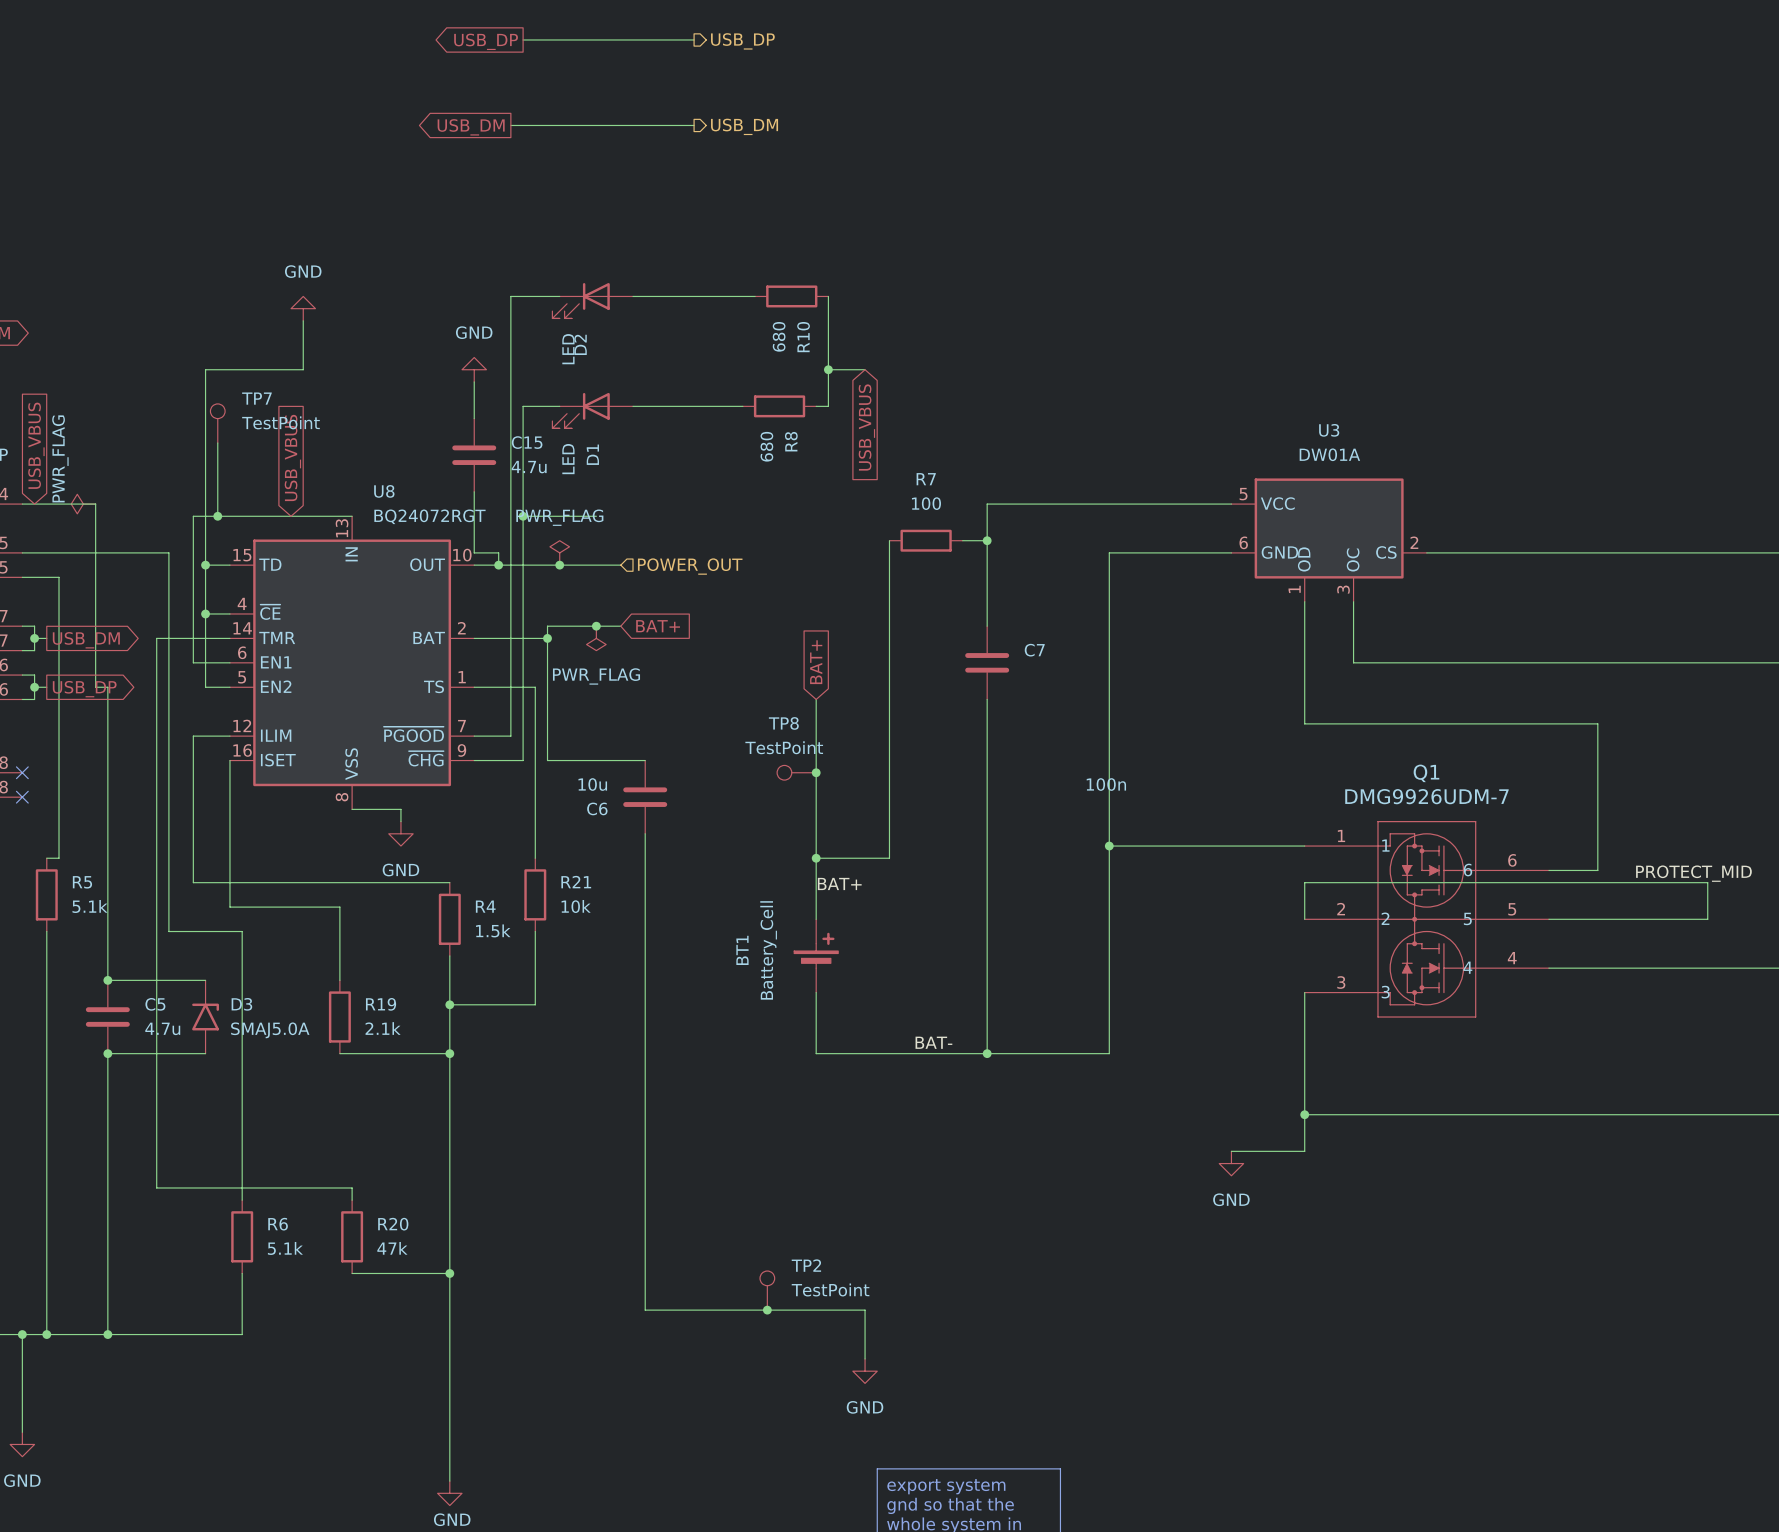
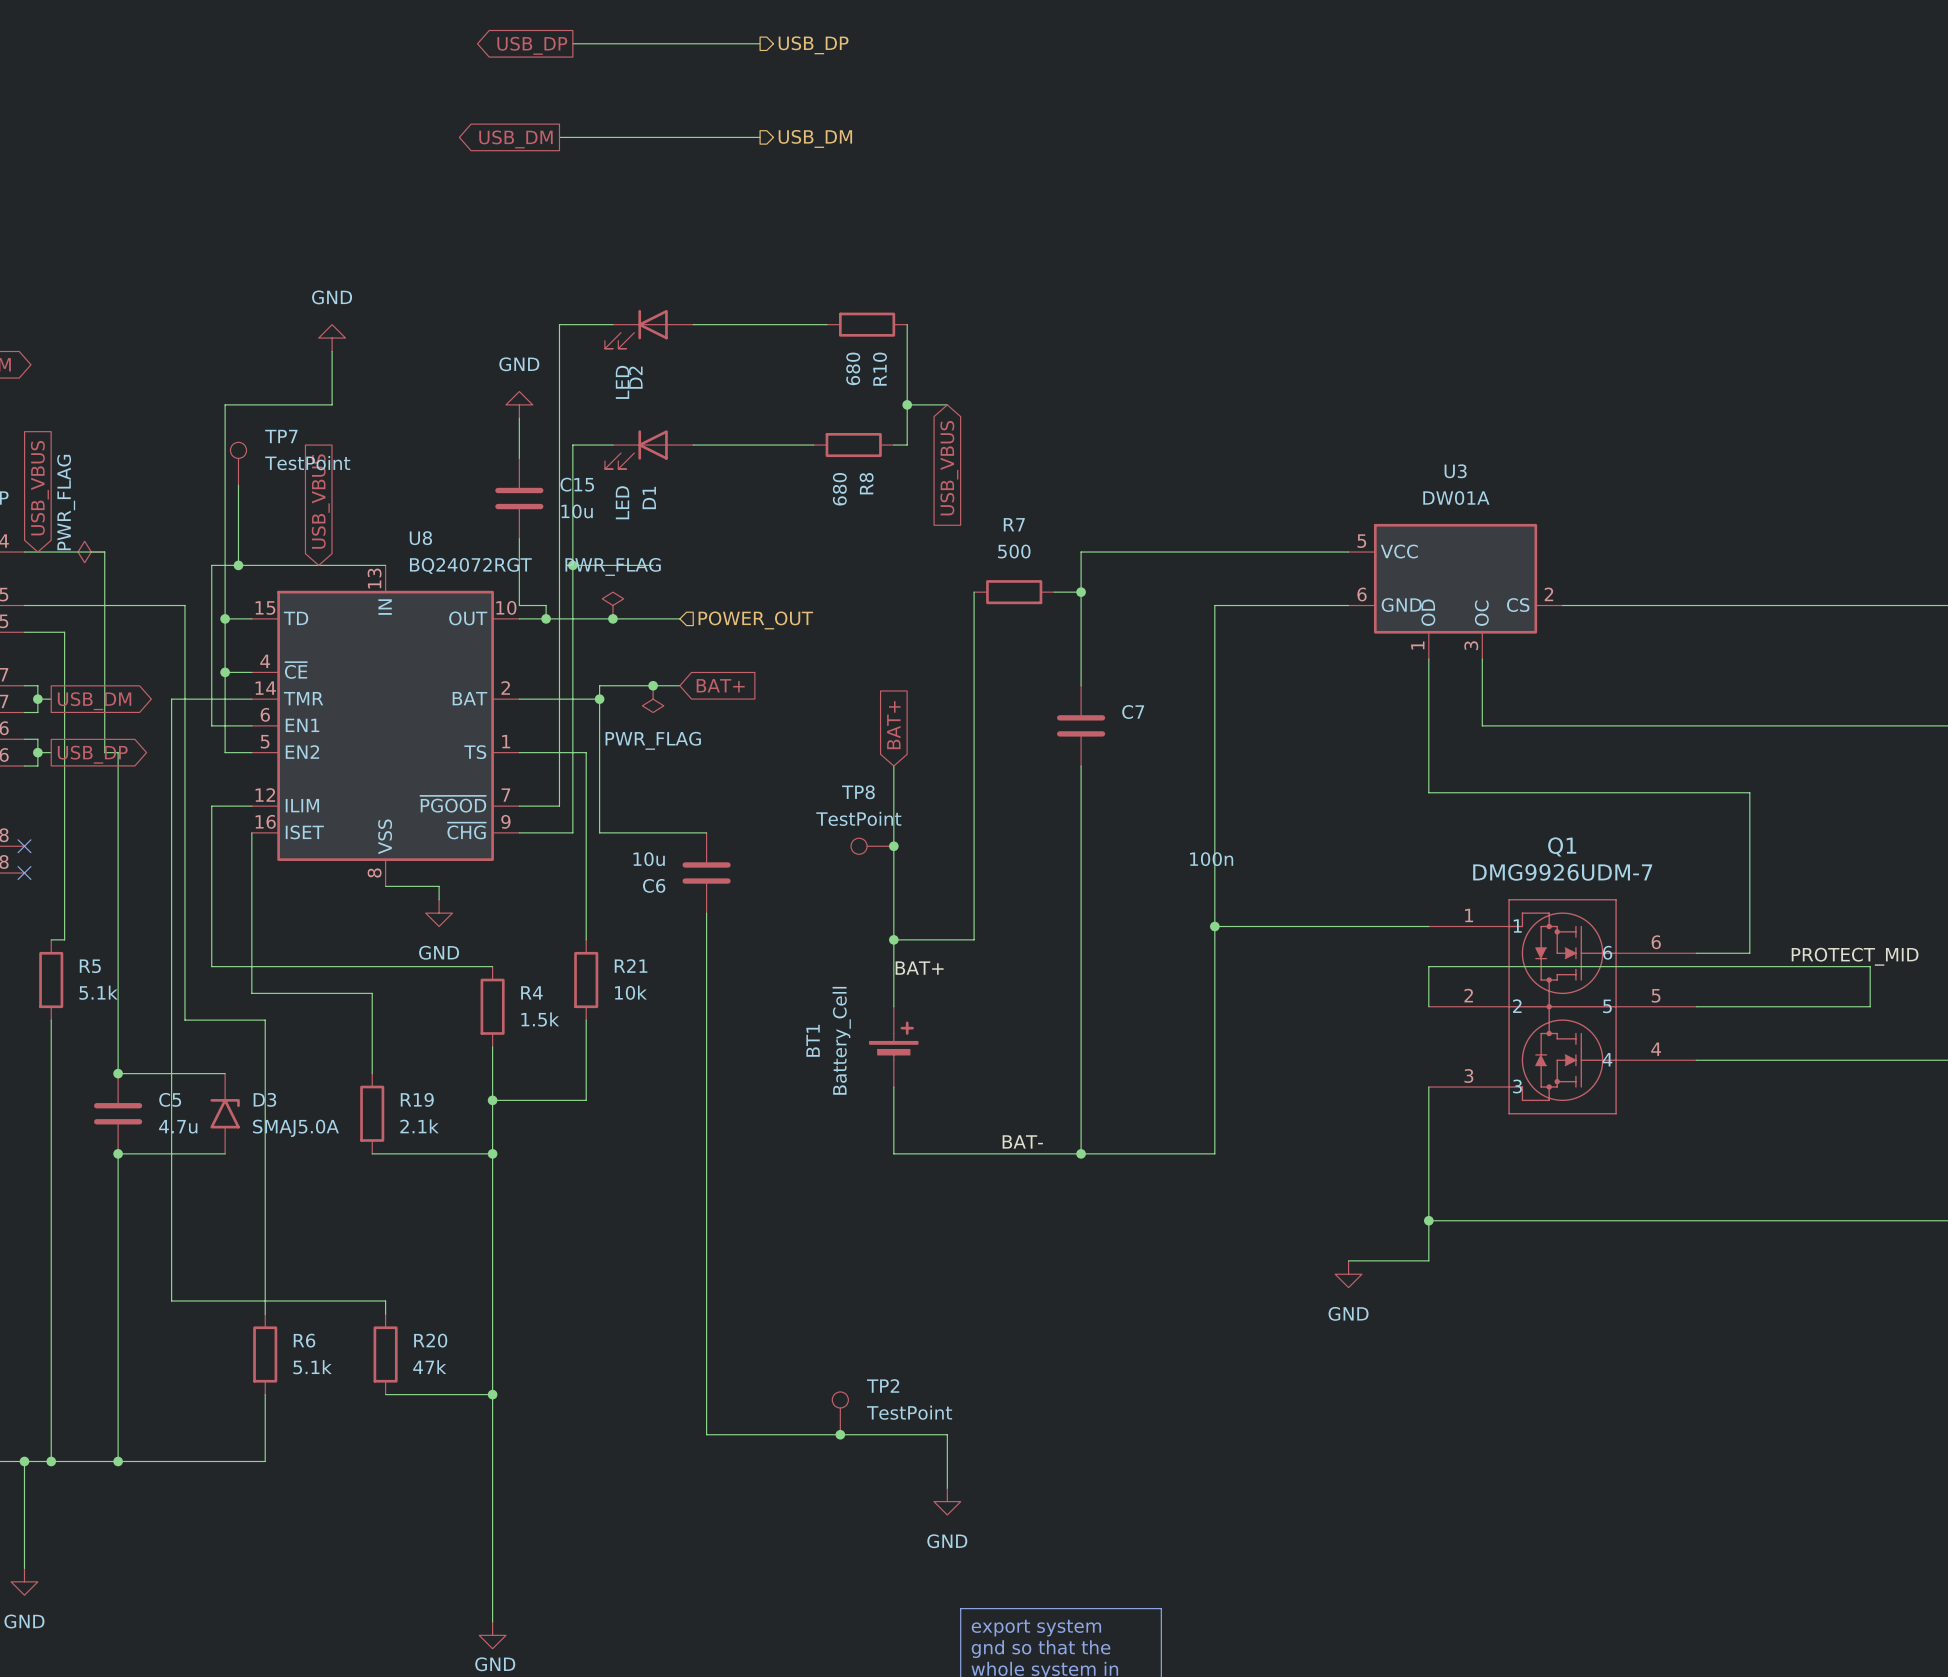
C15 value: 4.7u (529, 467) -> 10u (577, 511)
R7 value: 100 (926, 503) -> 500 (1014, 551)

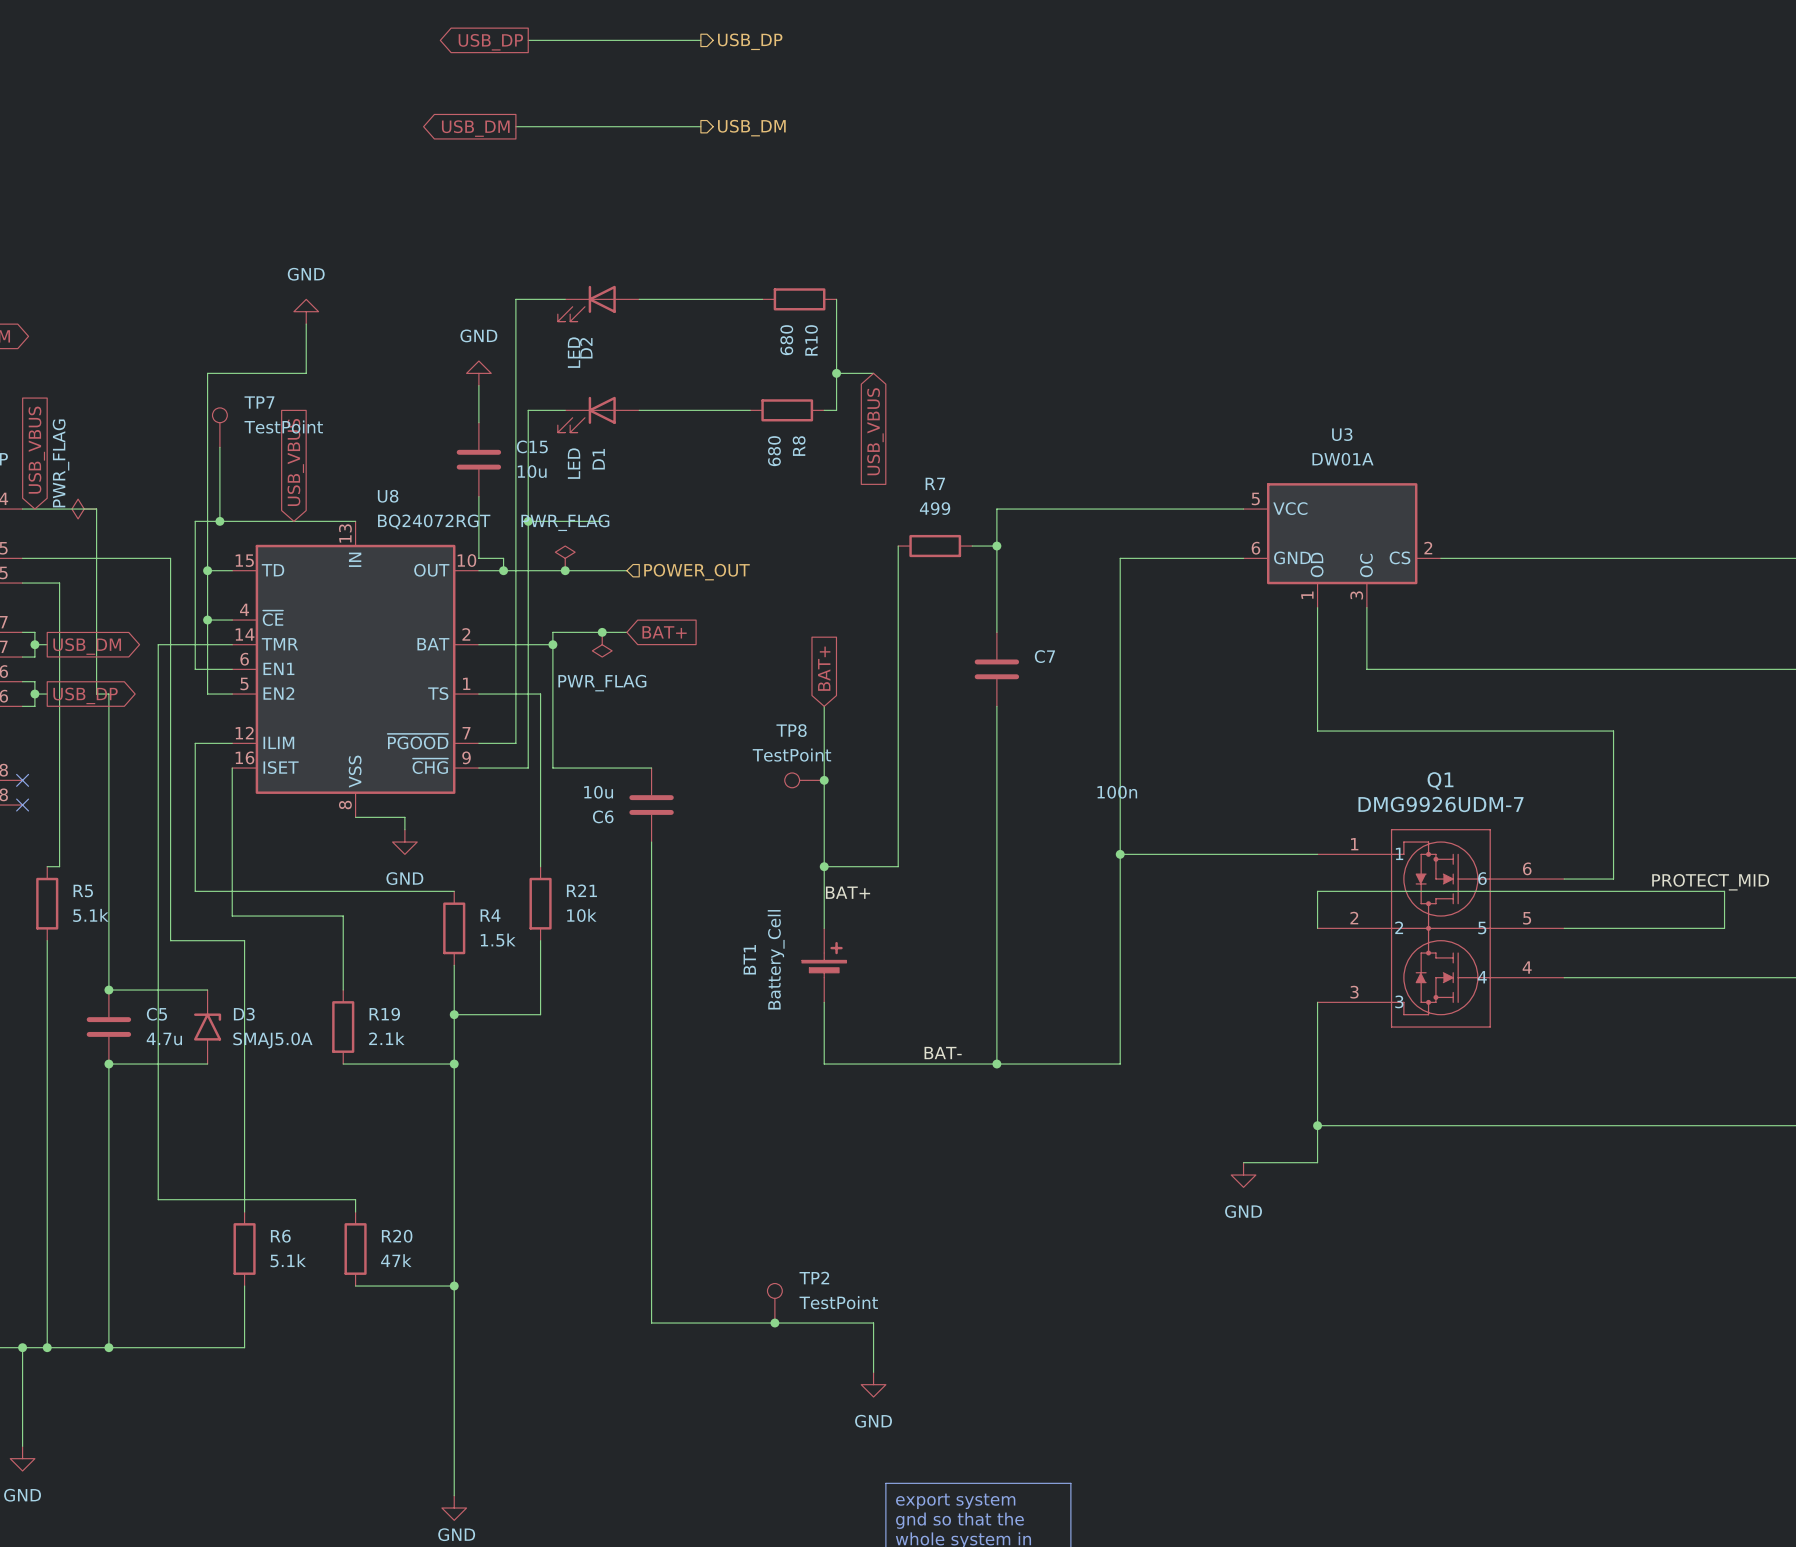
R7 value: 500 (1014, 551) -> 499 (935, 508)

